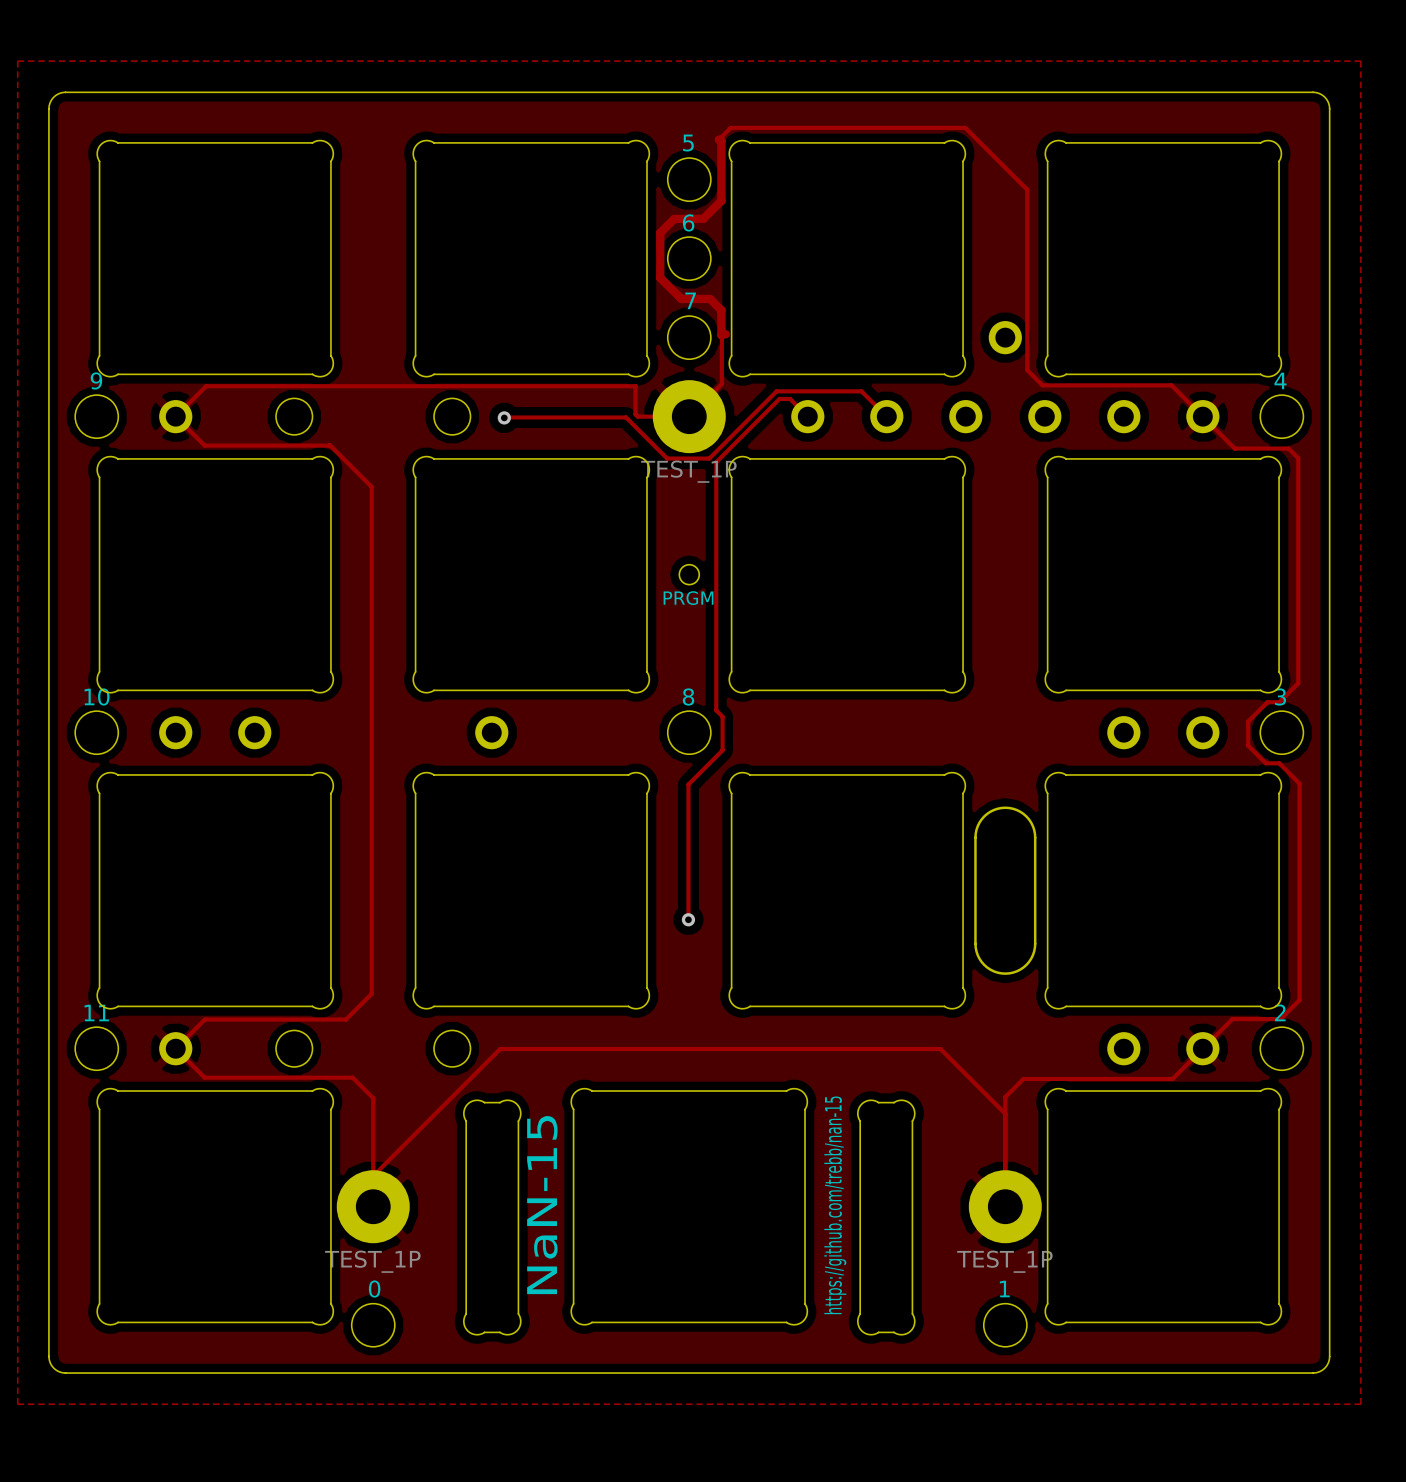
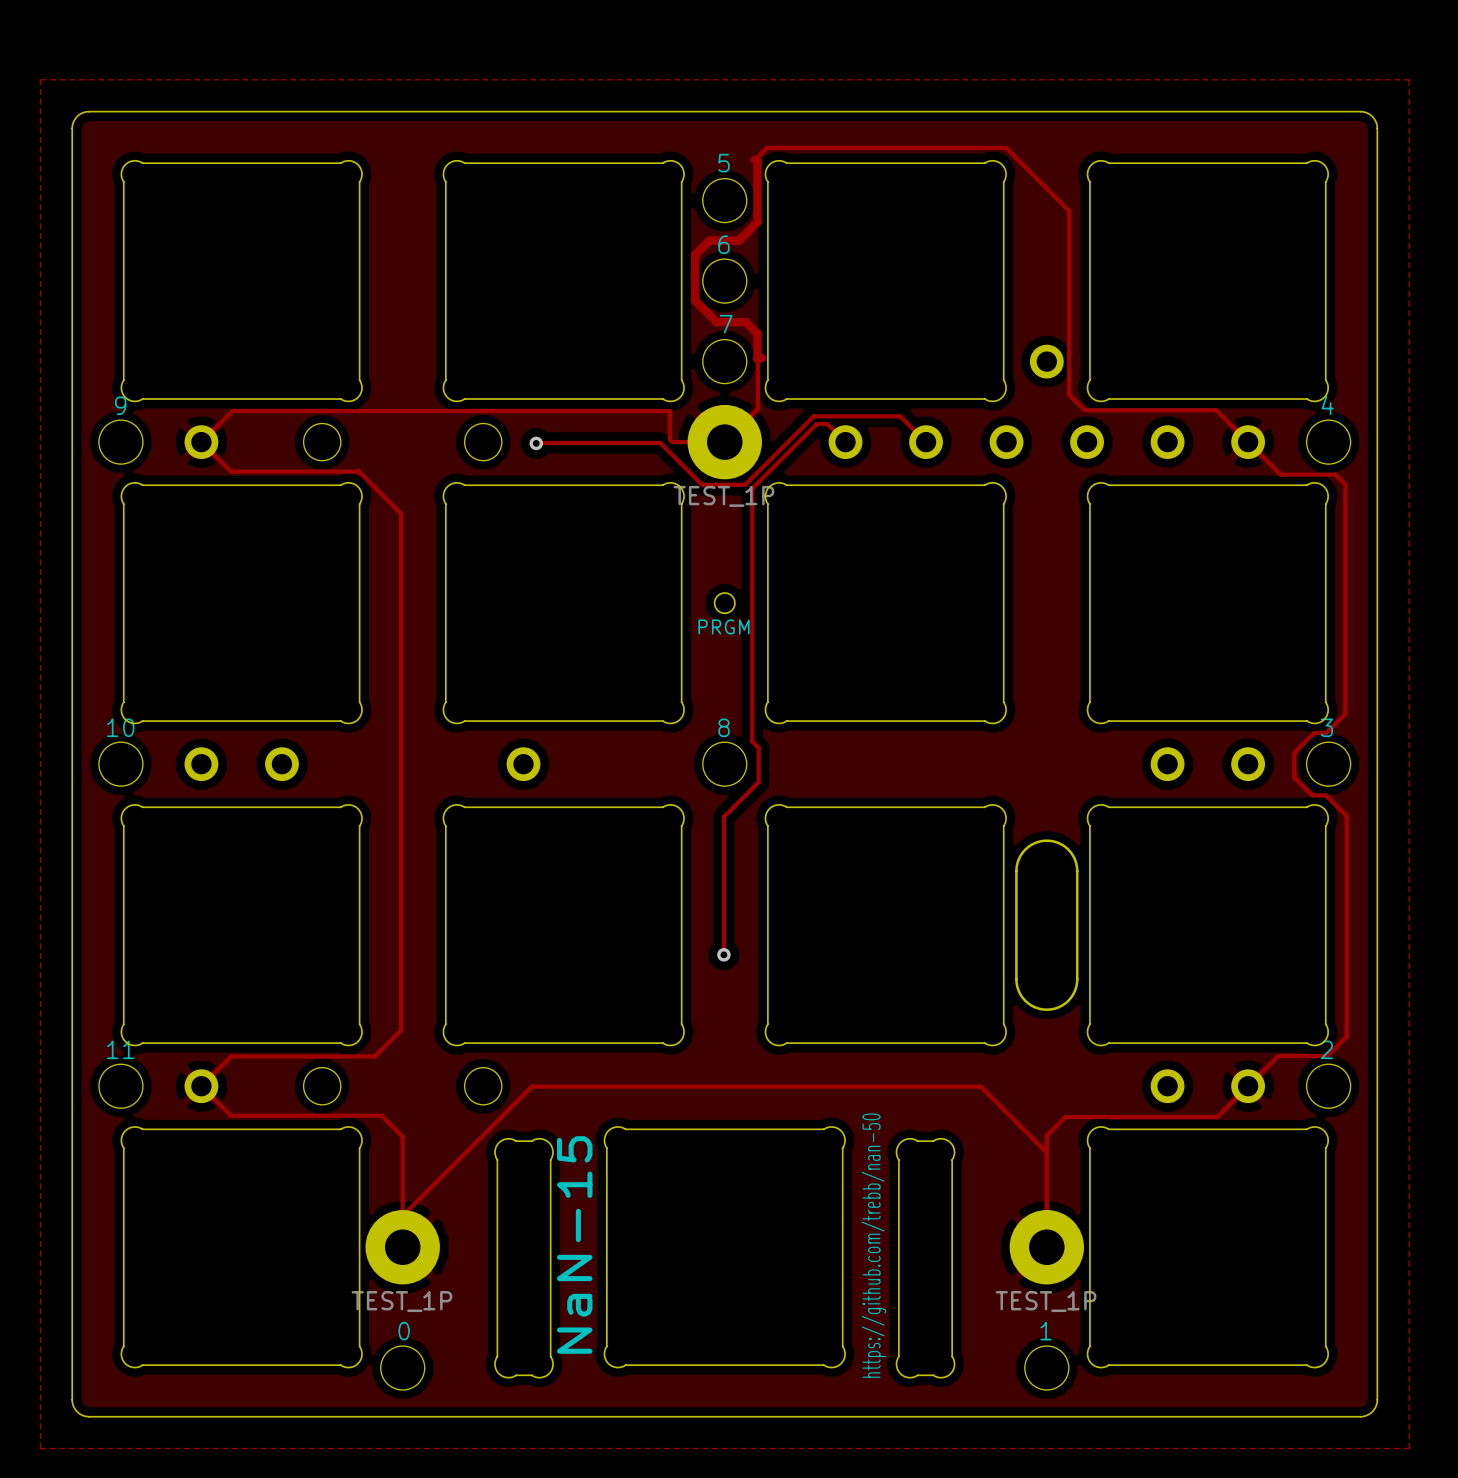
text: https://github.com/trebb/nan-15 (835, 1205) -> https://github.com/trebb/nan-50 (873, 1245)

